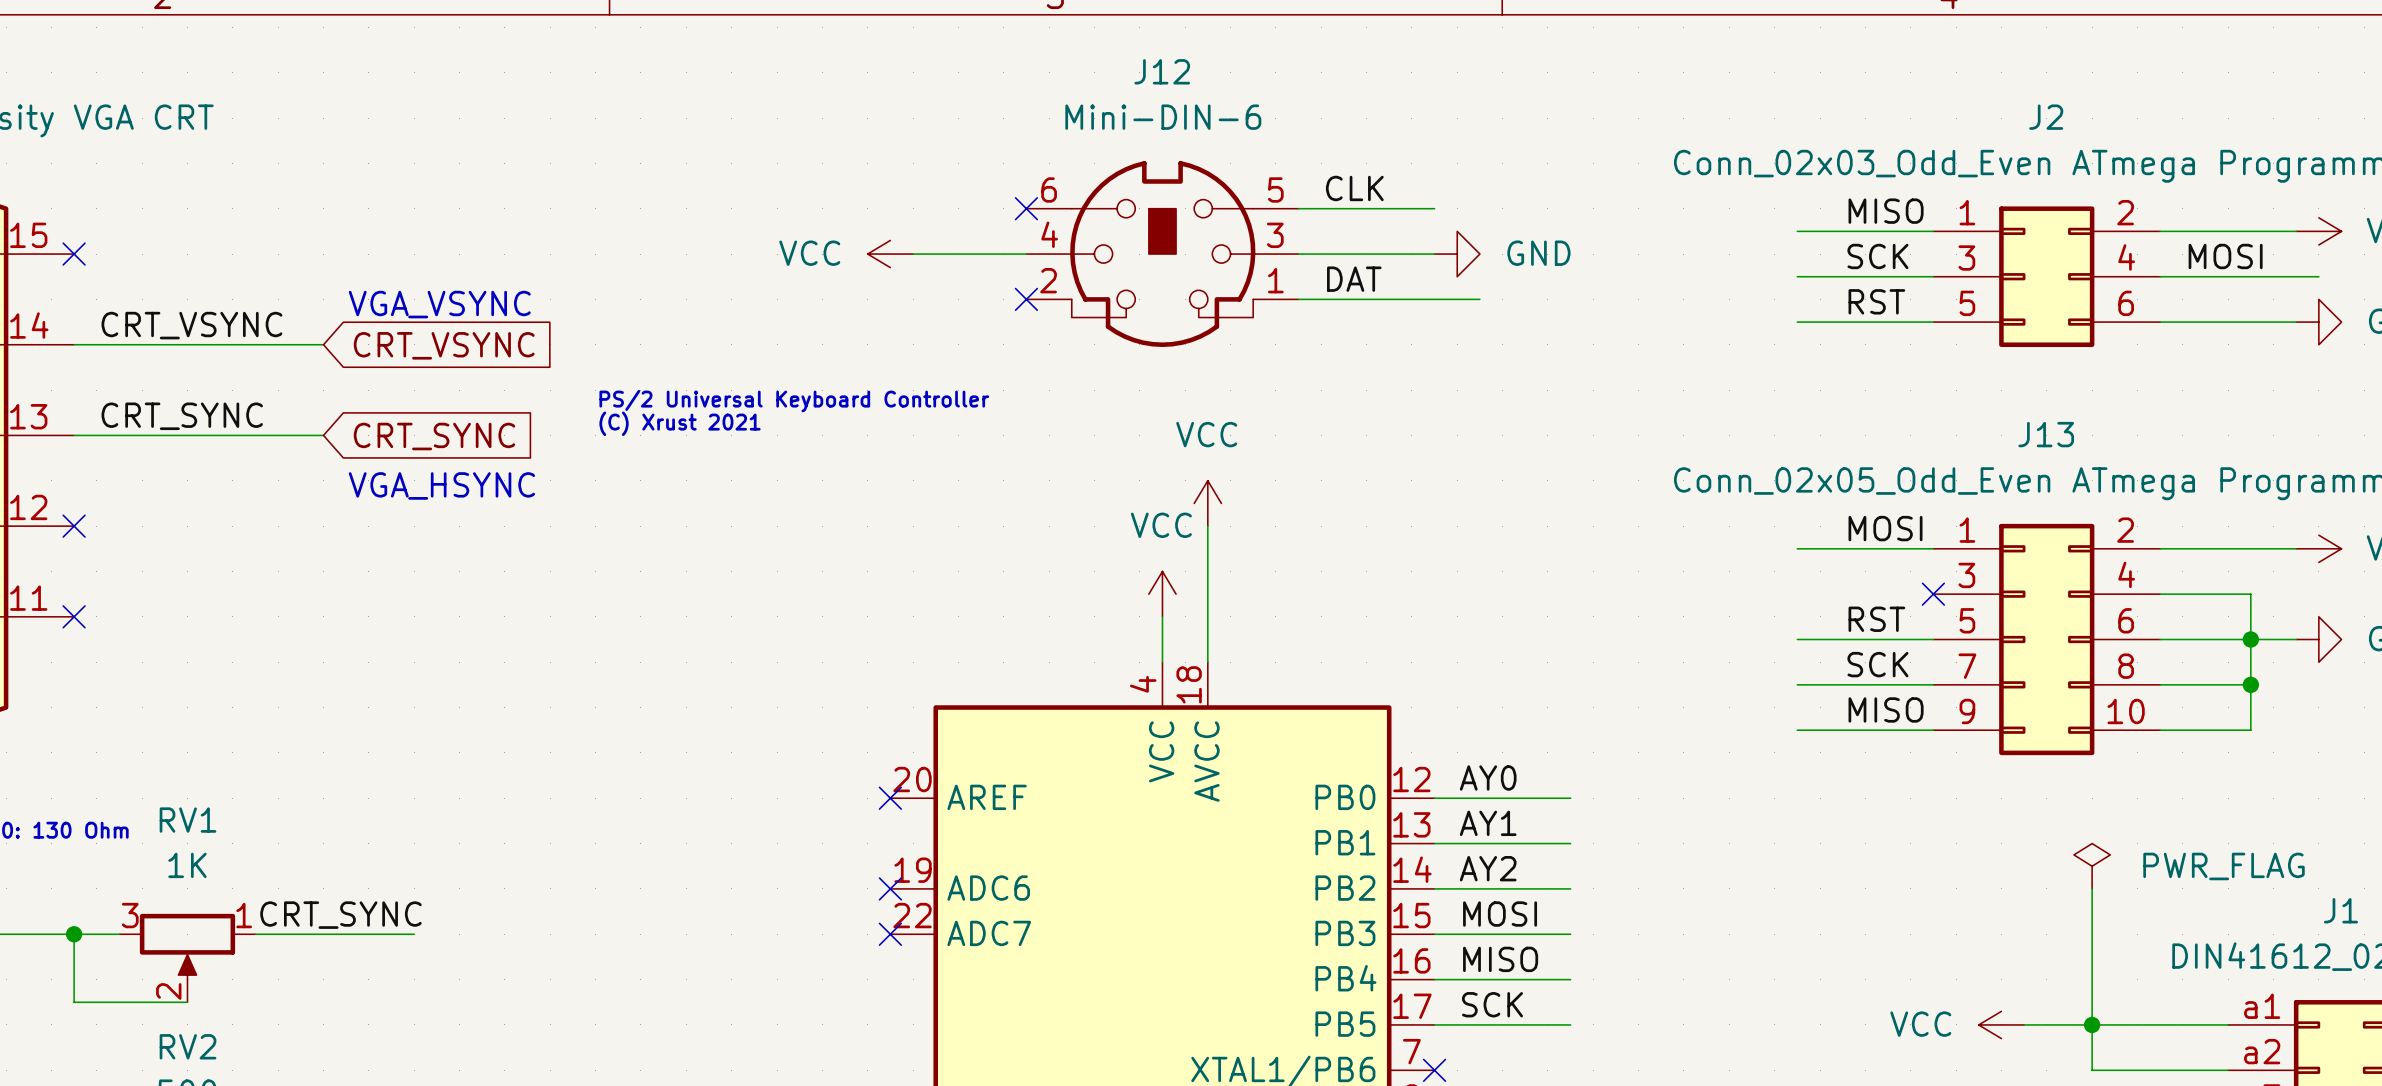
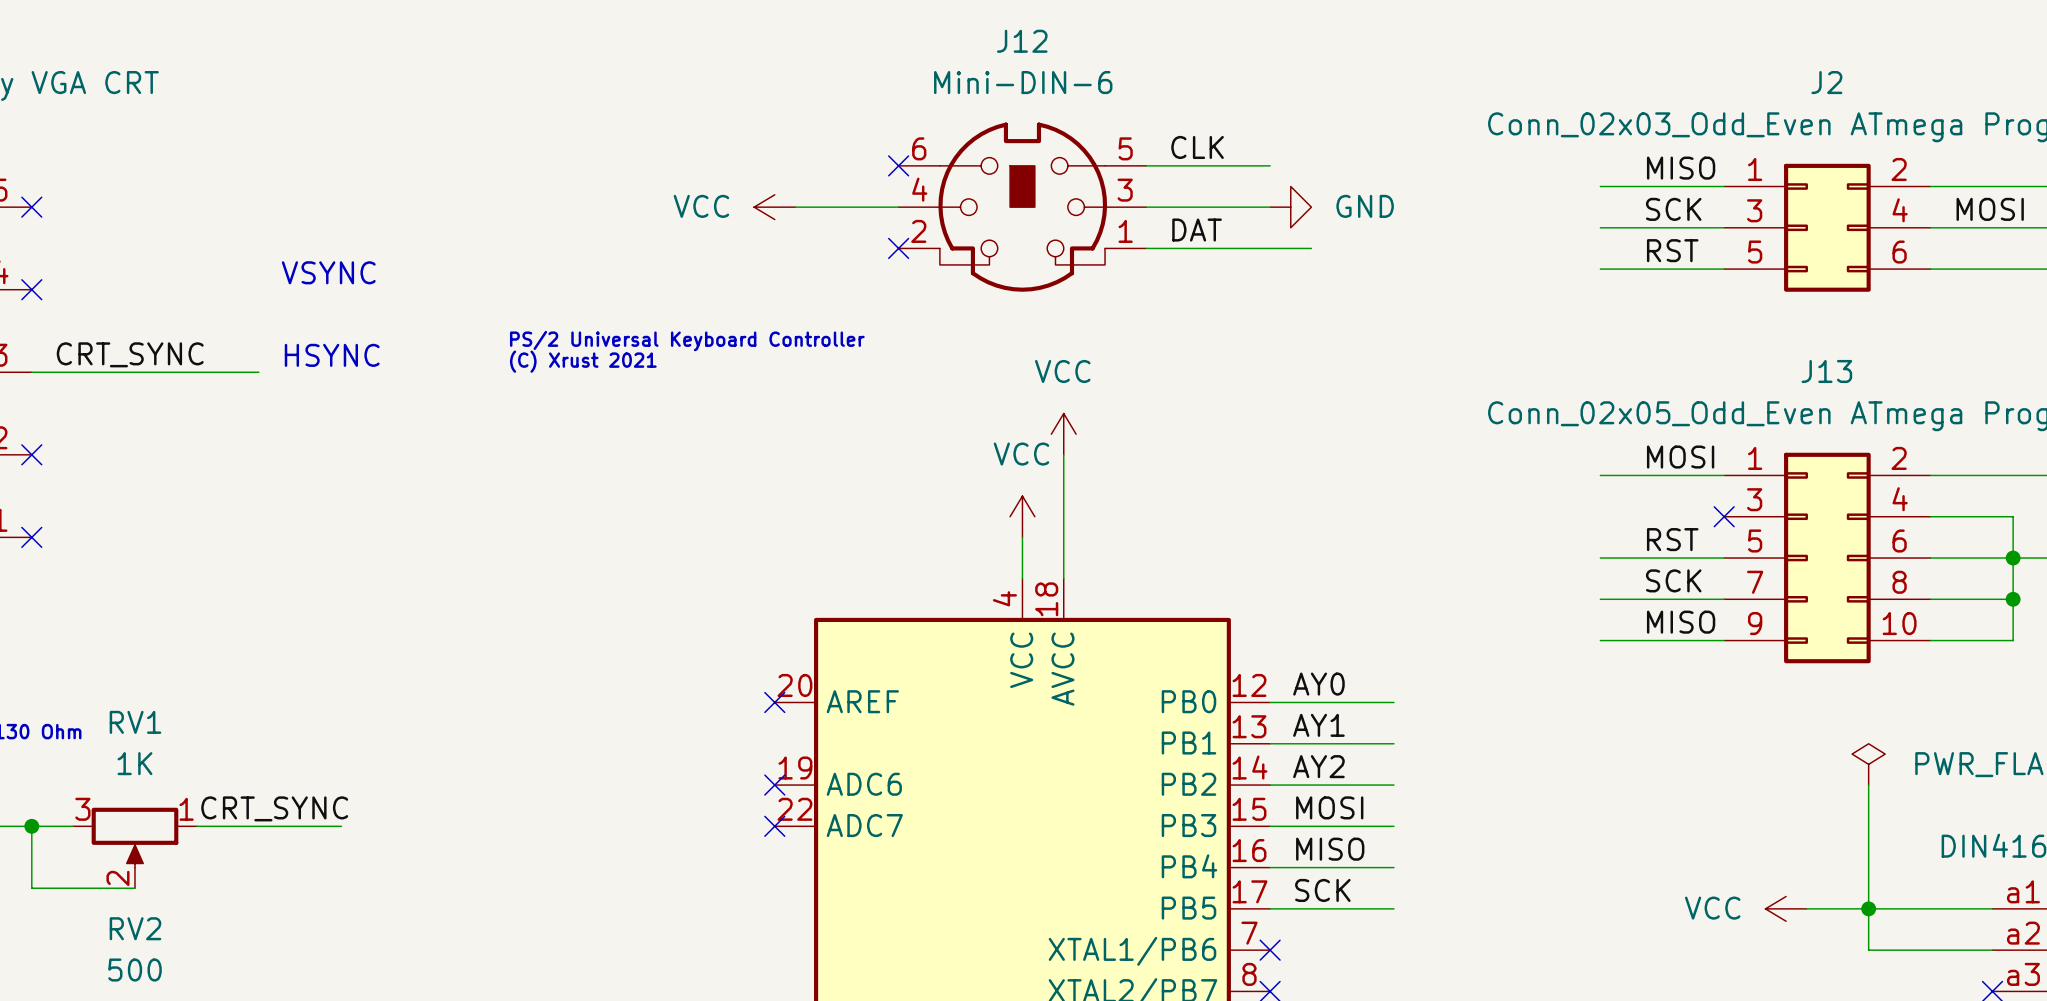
text: VGA_VSYNC (439, 304) -> VSYNC (328, 272)
label: CRT_VSYNC (191, 325) -> none
wire: (74, 344) (323, 344) -> none
no-connect mark: none -> (31, 289)
global label: CRT_VSYNC (444, 345) -> none
text: none -> HSYNC (332, 355)
global label: CRT_SYNC (434, 436) -> none
text: VGA_HSYNC (441, 485) -> none

